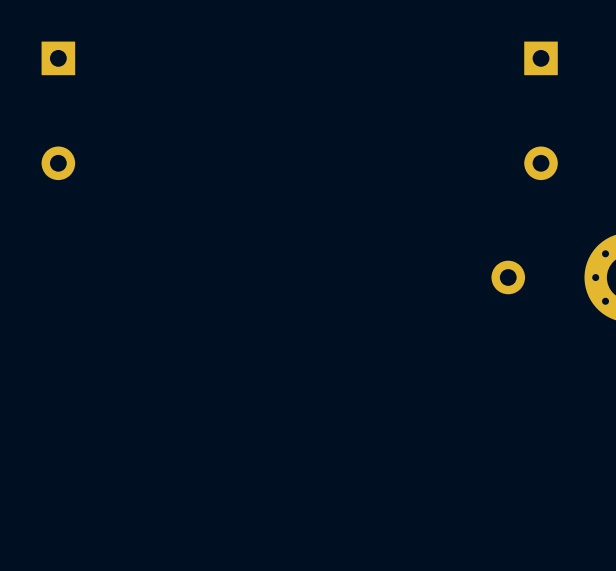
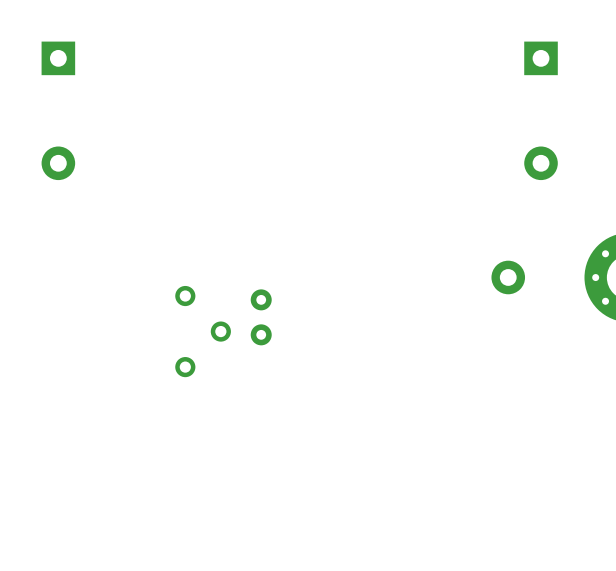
part: none -> (261, 299)
part: none -> (203, 331)
part: none -> (261, 334)

